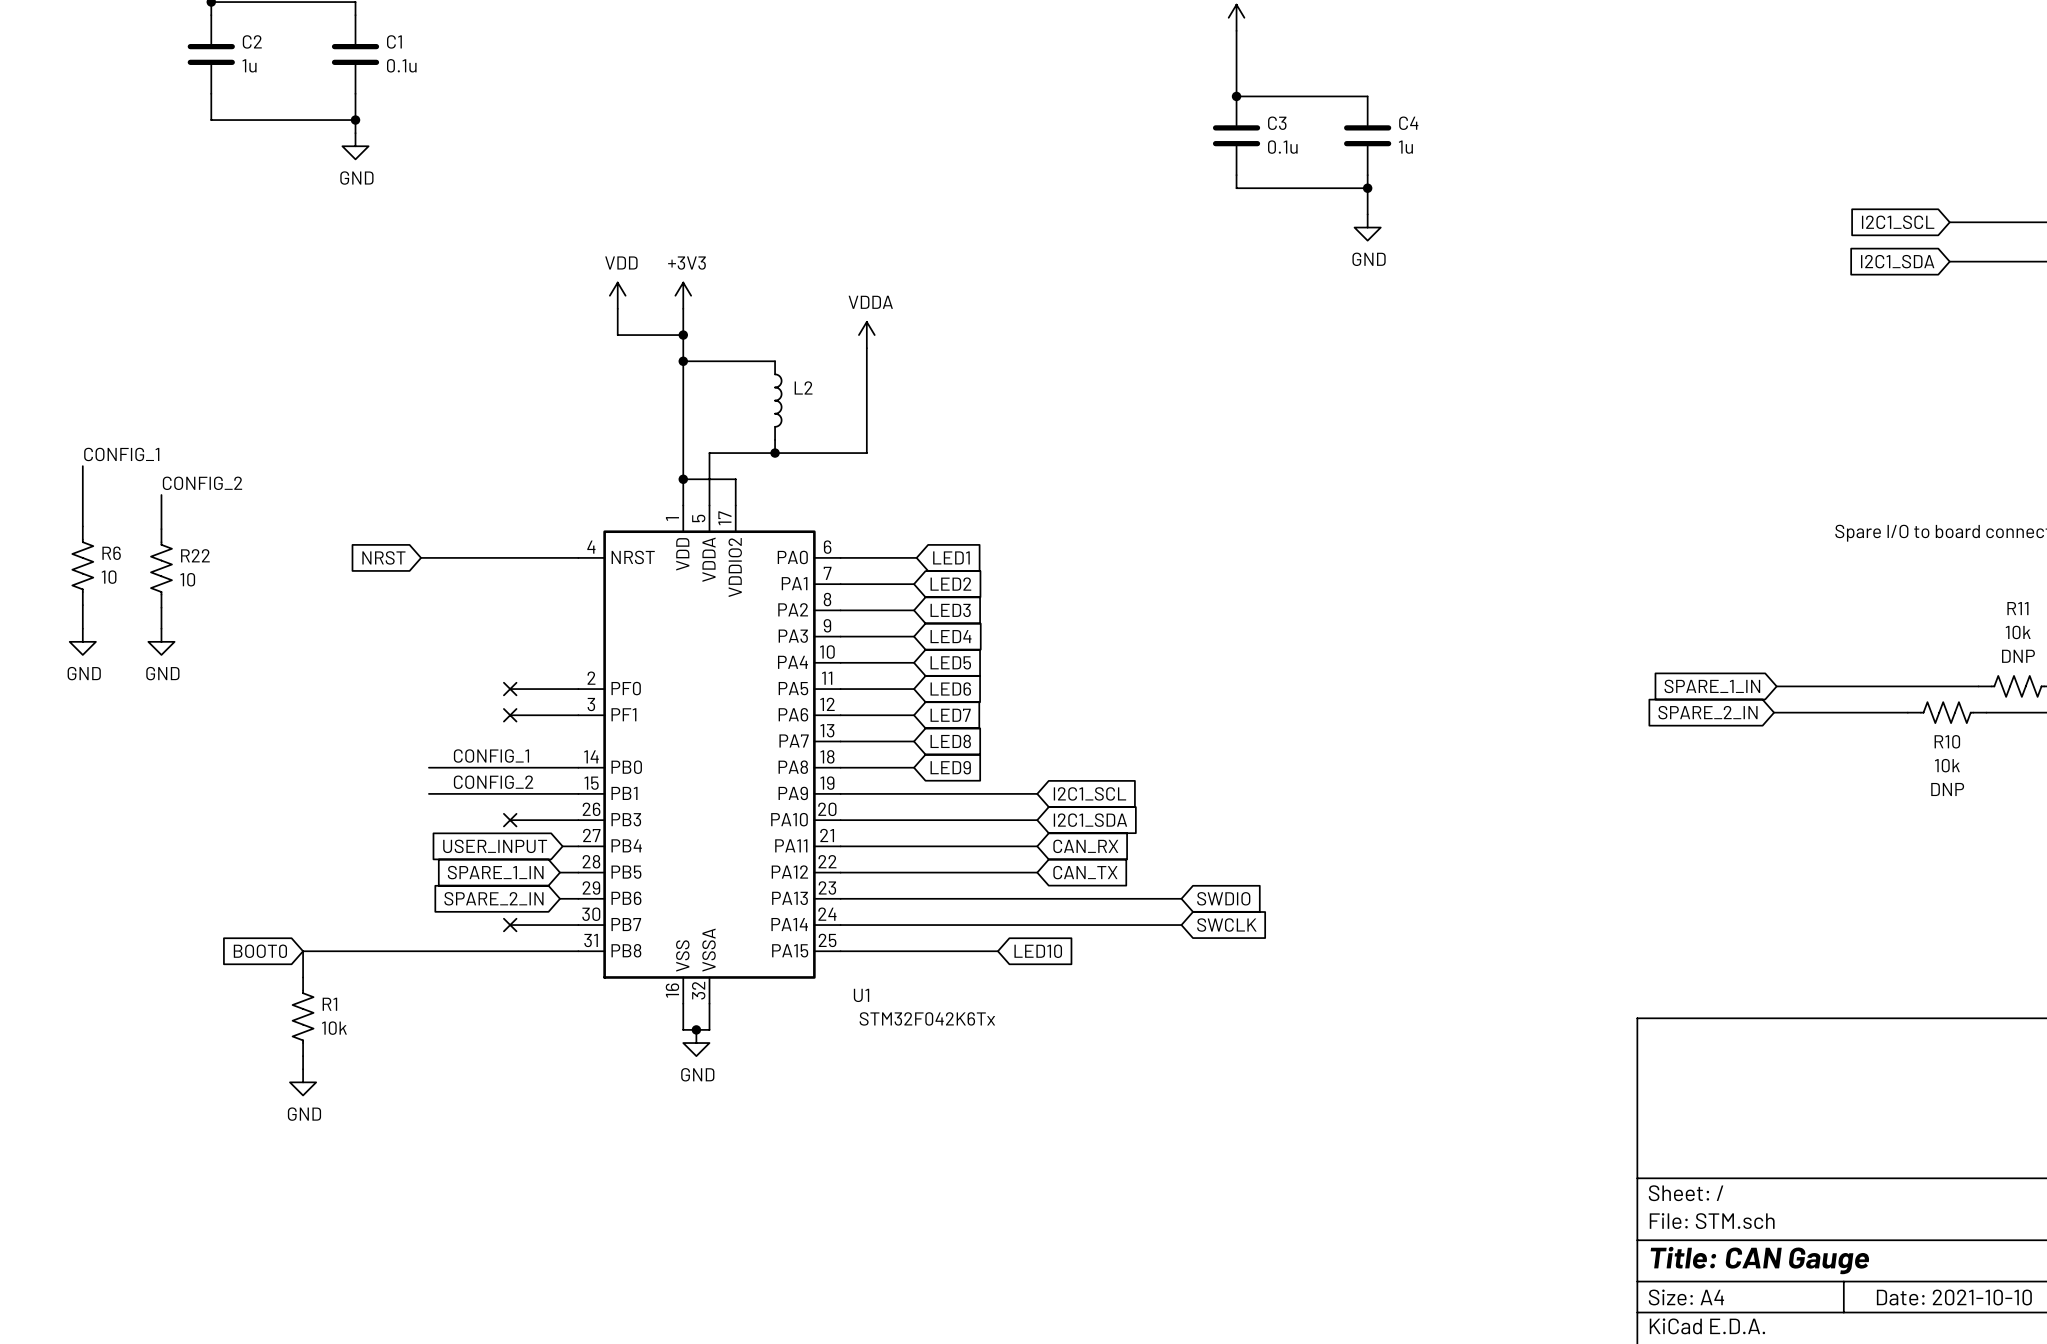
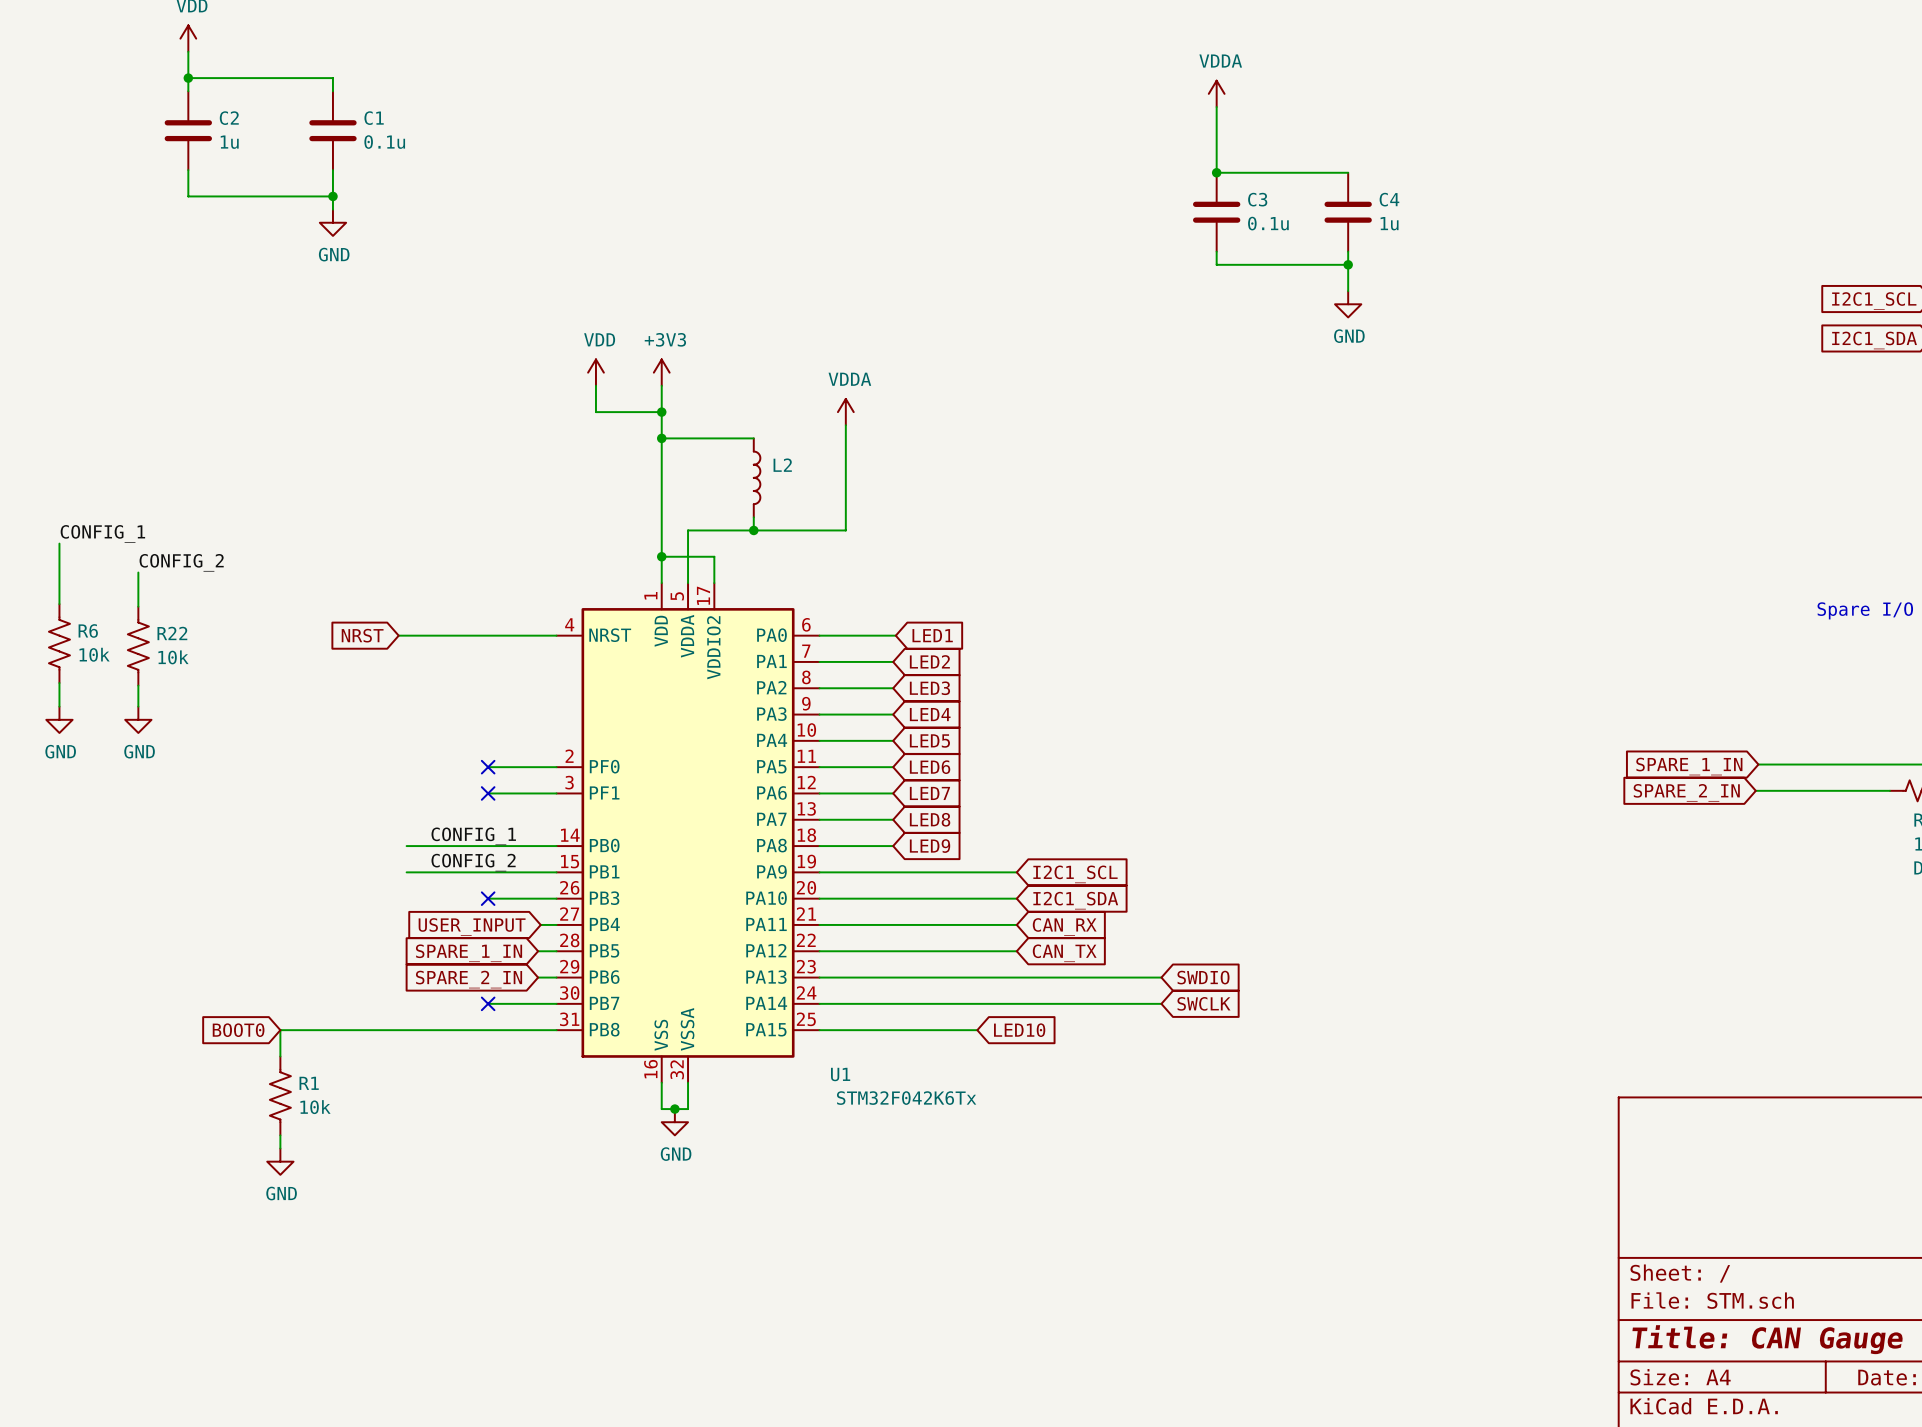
R6 value: 10 (109, 577) -> 10k (94, 654)
R22 value: 10 (187, 579) -> 10k (173, 657)

